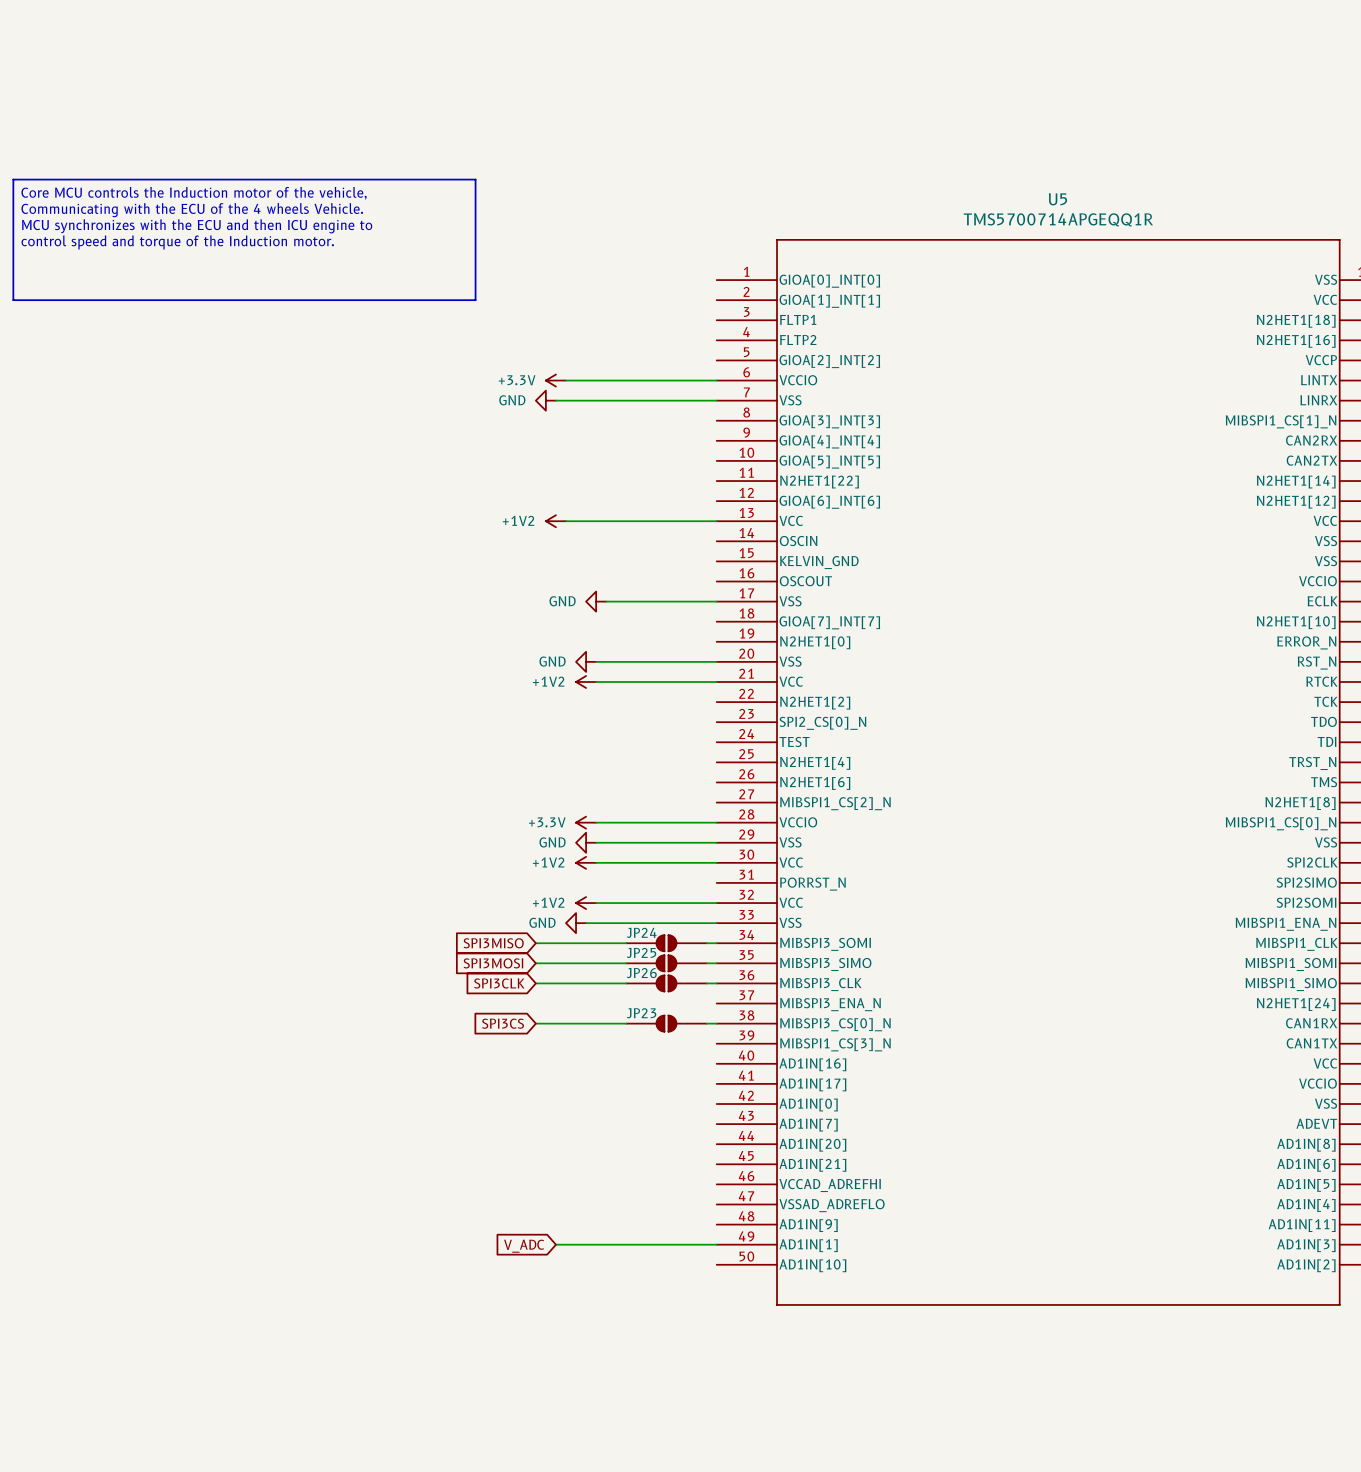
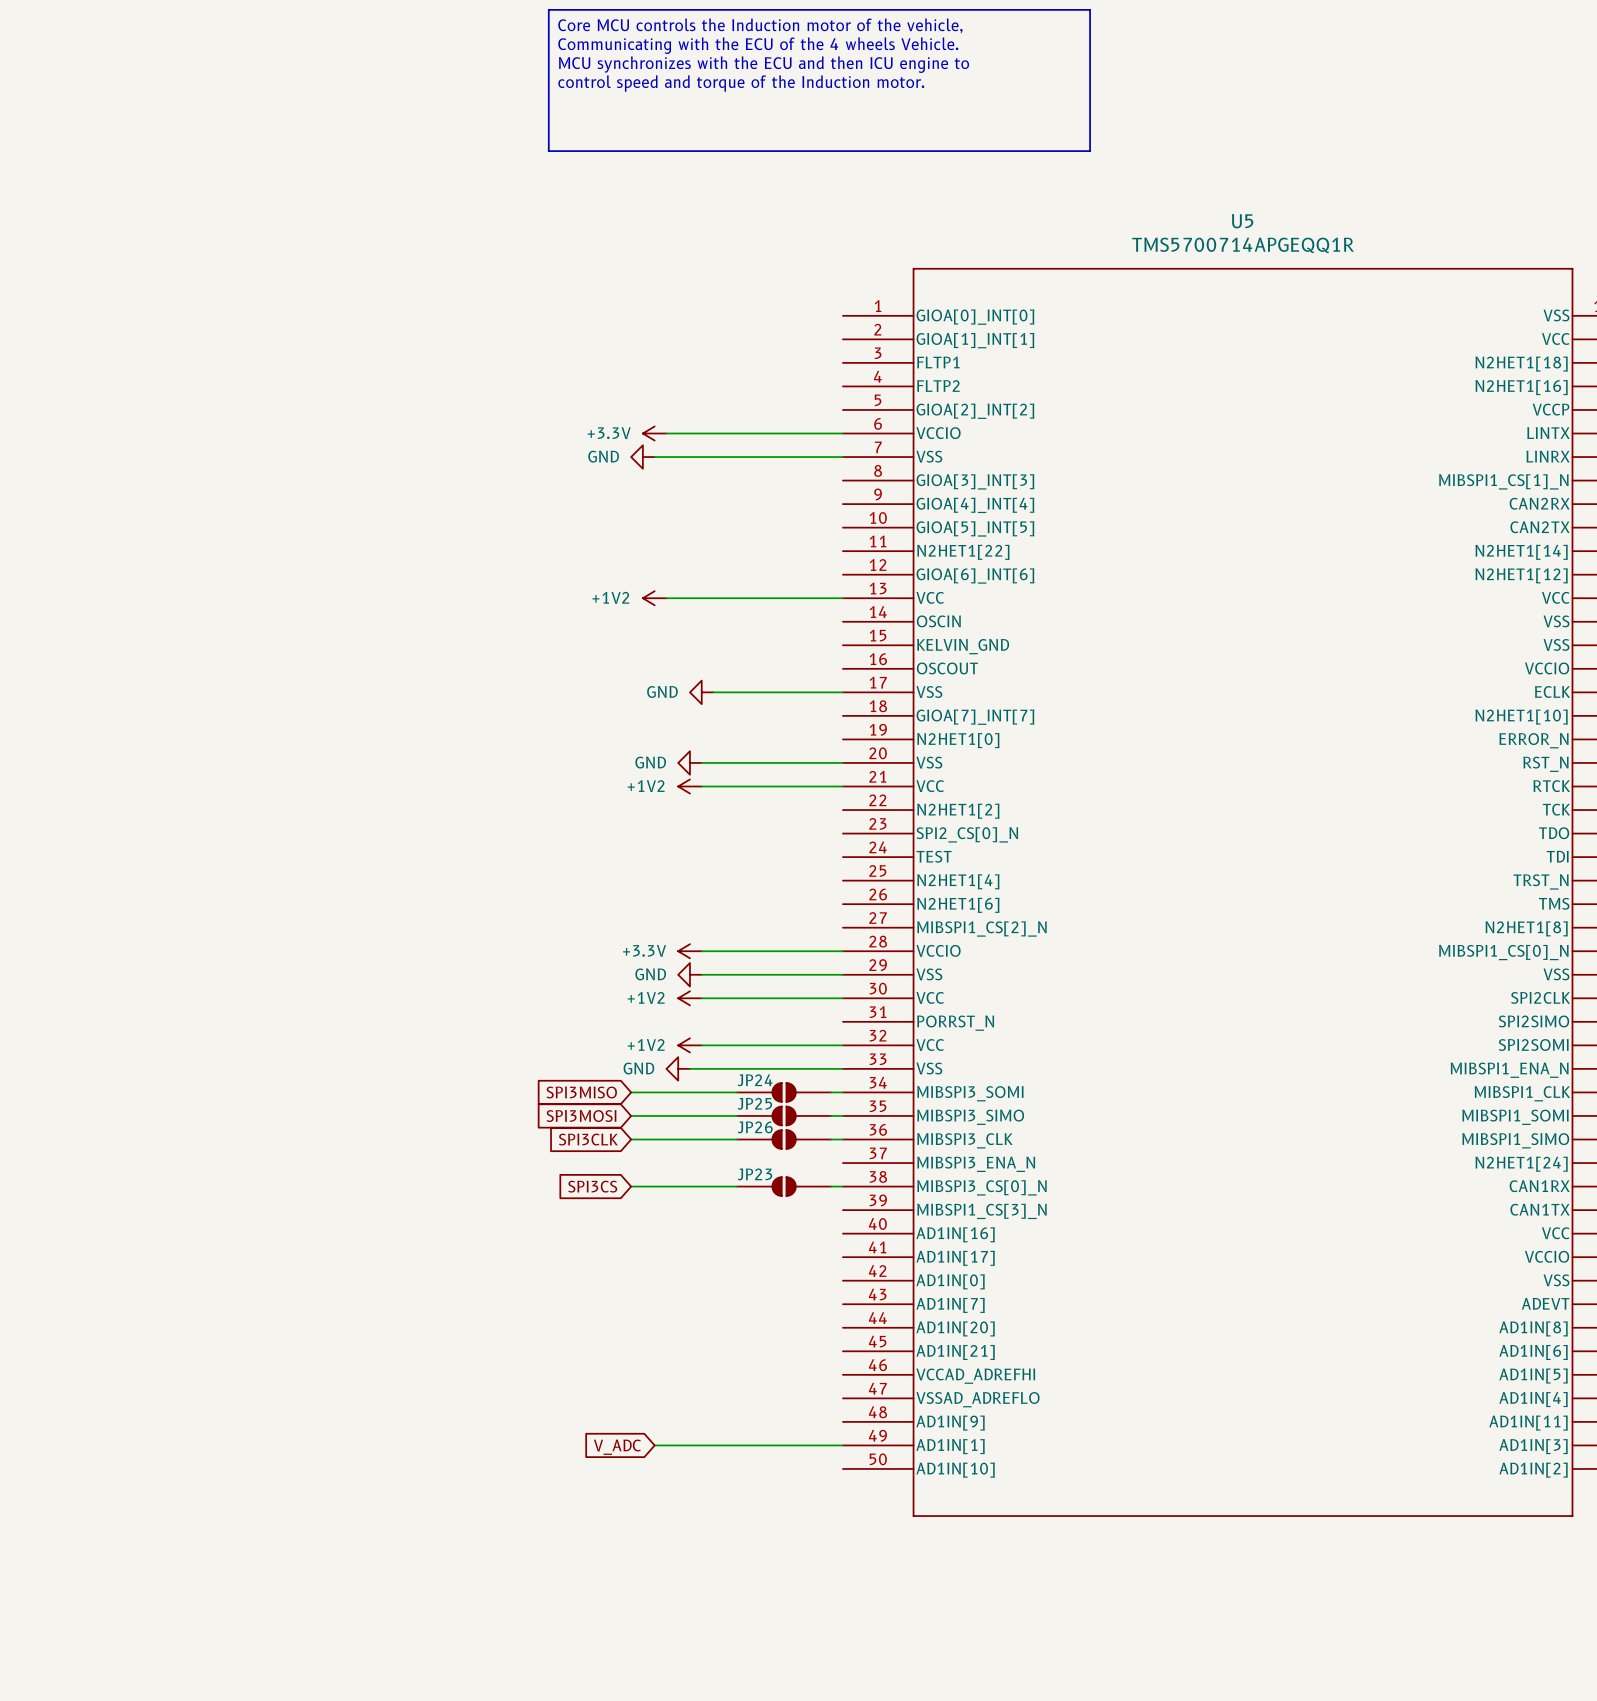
line: none -> (548, 9) (1090, 9) (1090, 151) (548, 151) (548, 9)
text: none -> Core MCU controls the Induction motor of the vehicle, (760, 25)
text: none -> Communicating with the ECU of the 4 wheels Vehicle. (758, 45)
text: none -> MCU synchronizes with the ECU and then ICU engine to (763, 64)
text: none -> control speed and torque of the Induction motor. (741, 83)
line: (13, 179) (475, 179) (475, 300) (13, 300) (13, 179) -> none
text: Core MCU controls the Induction motor of the vehicle, (194, 193) -> none
text: Communicating with the ECU of the 4 wheels Vehicle. (192, 210) -> none
text: MCU synchronizes with the ECU and then ICU engine to (197, 226) -> none
text: control speed and torque of the Induction motor. (177, 242) -> none

